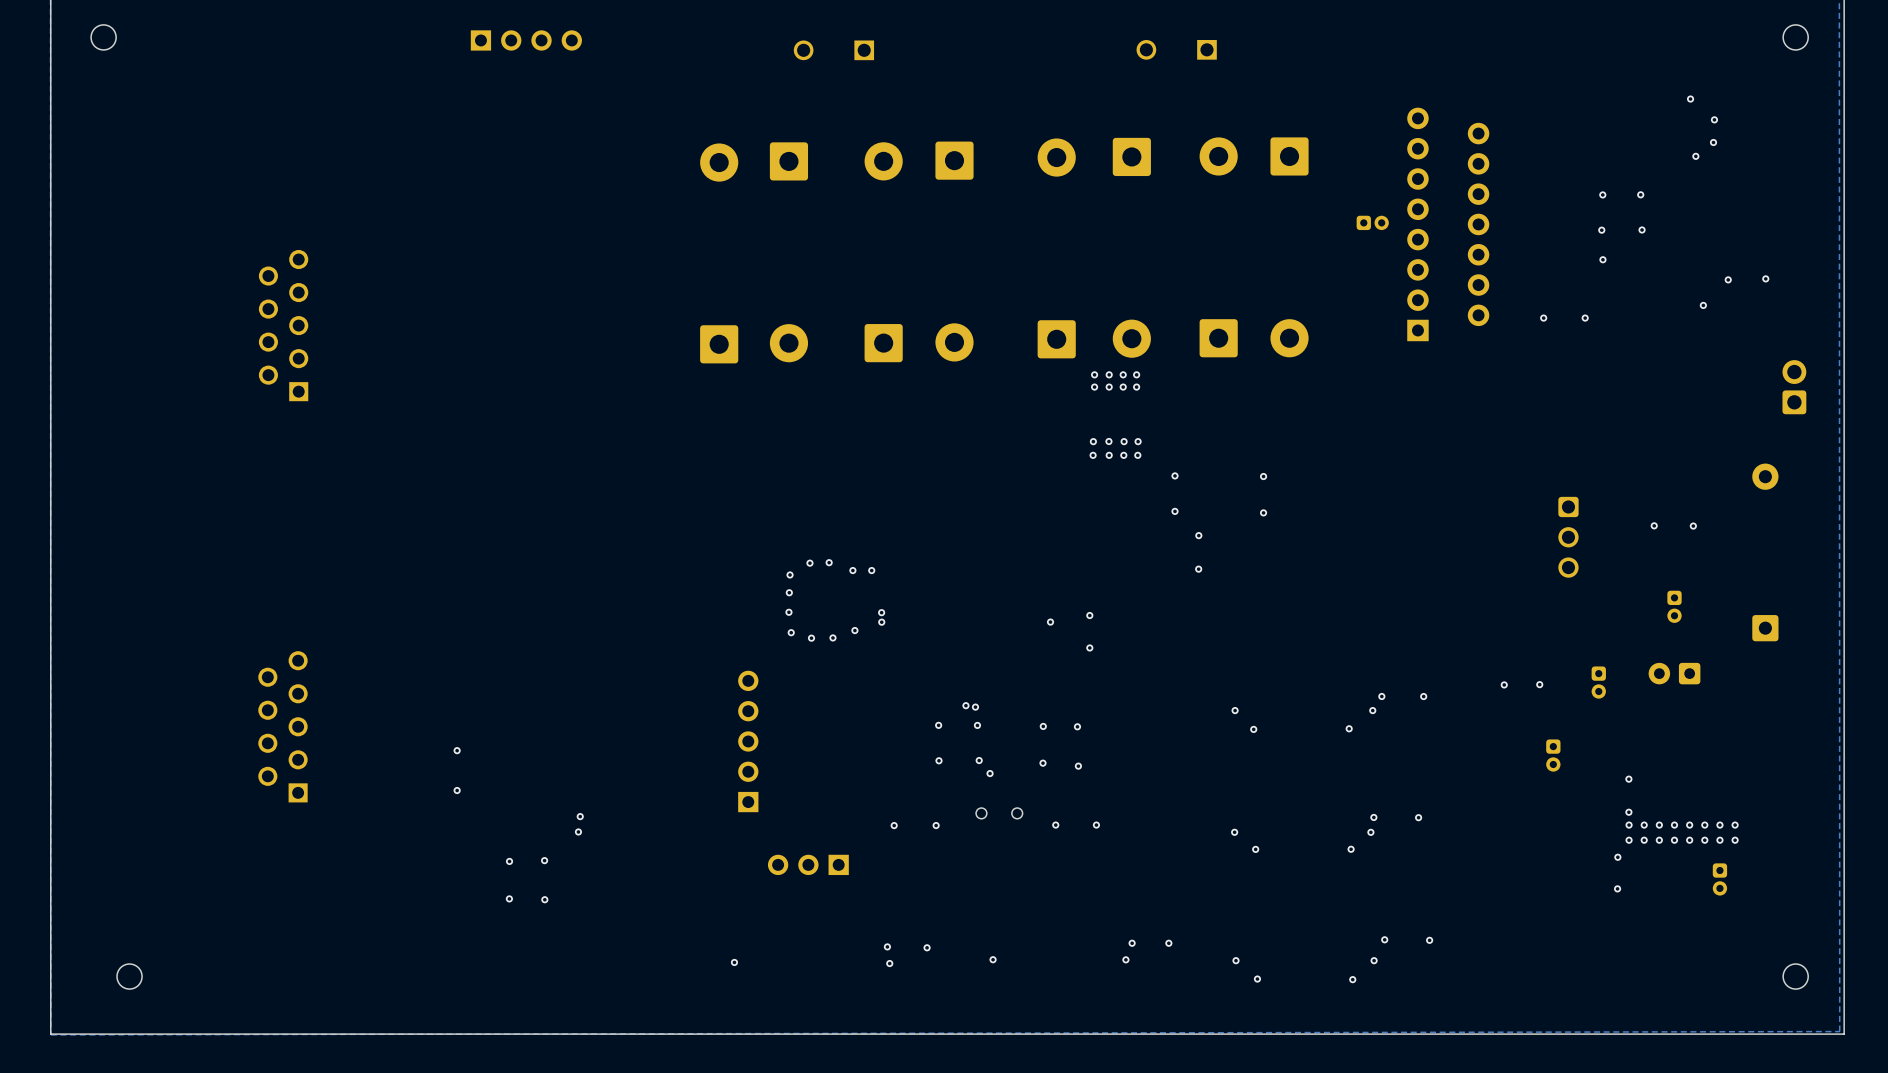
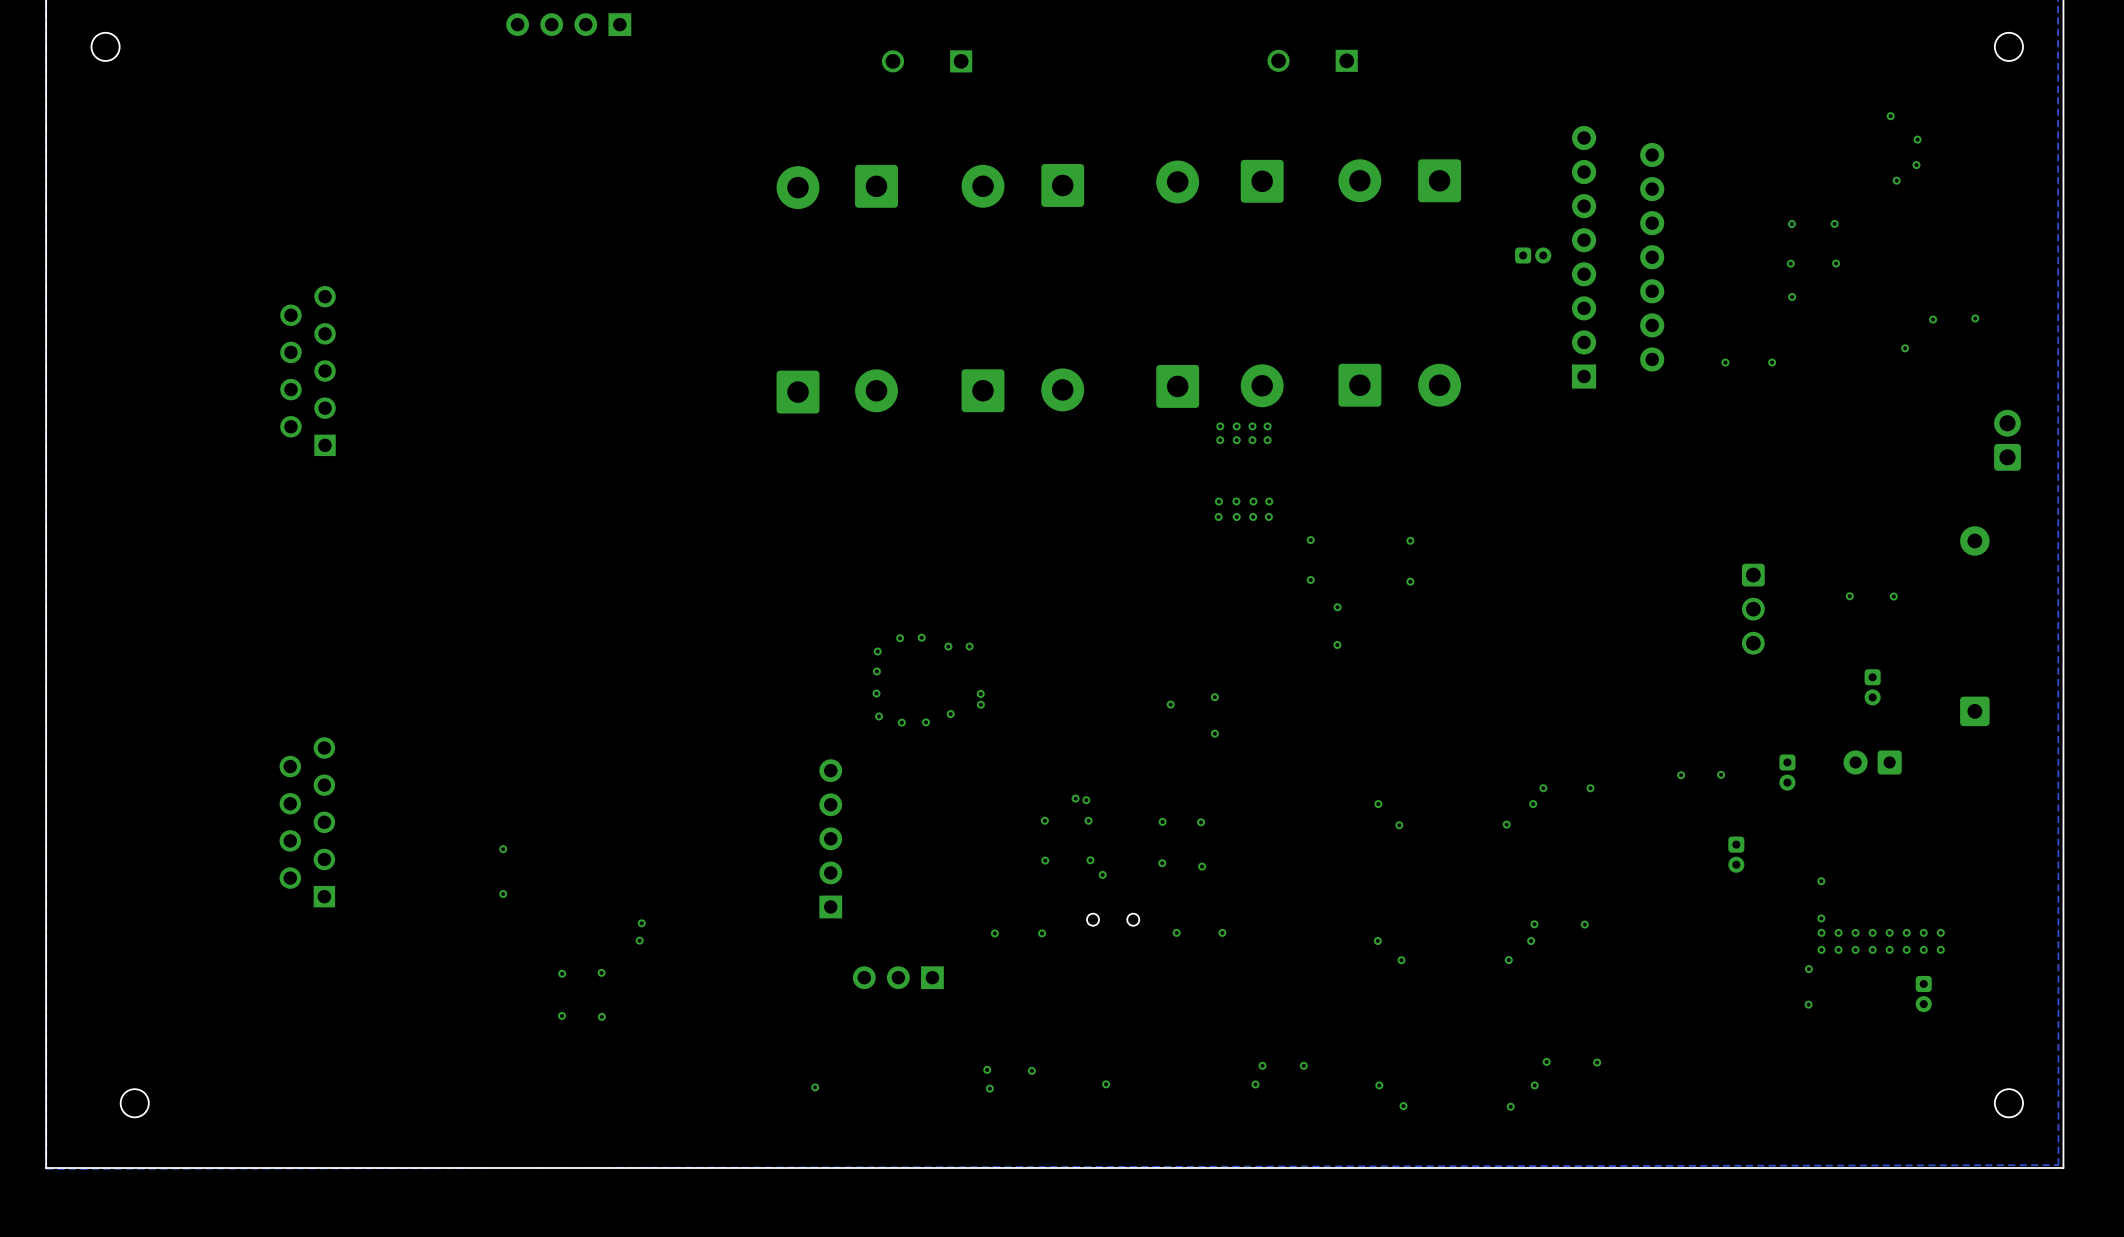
part rotation: 0° (526, 40) -> 180° (568, 24)

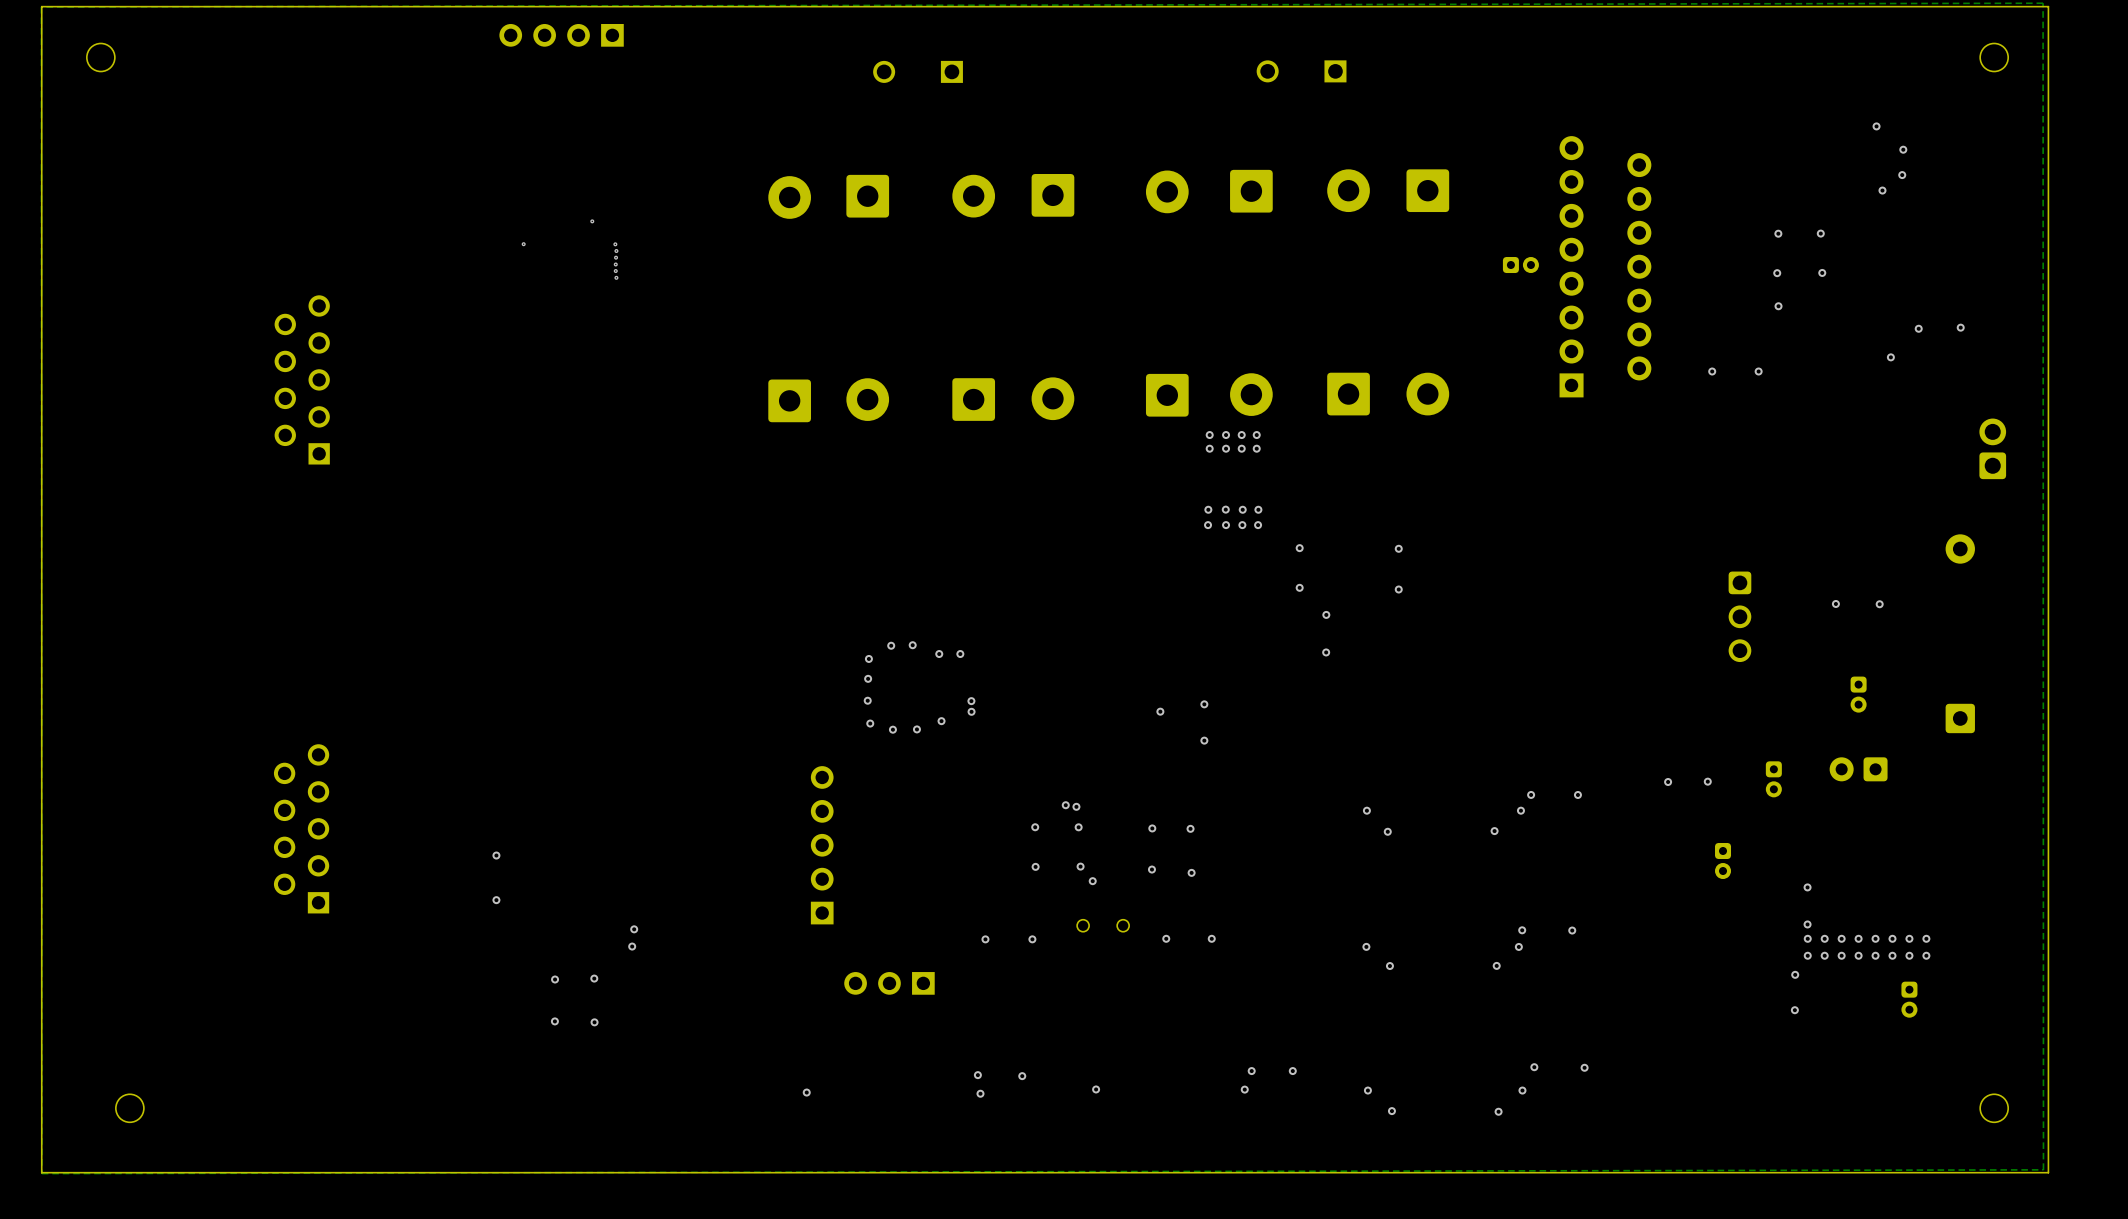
via: none -> (592, 221)
via: none -> (523, 244)
via: none -> (615, 244)
via: none -> (616, 251)
via: none -> (616, 257)
via: none -> (615, 264)
via: none -> (615, 271)
via: none -> (616, 277)

